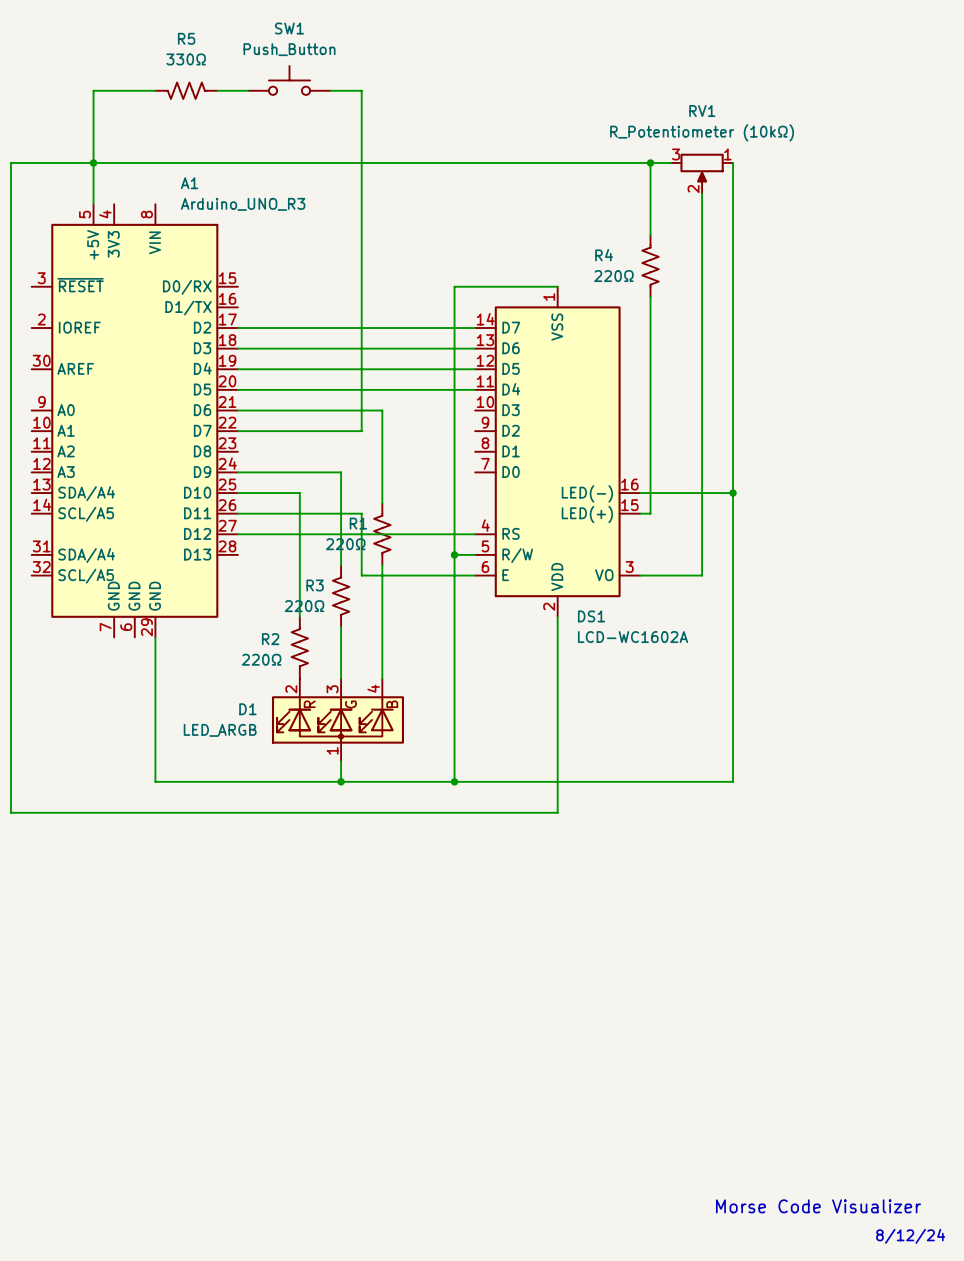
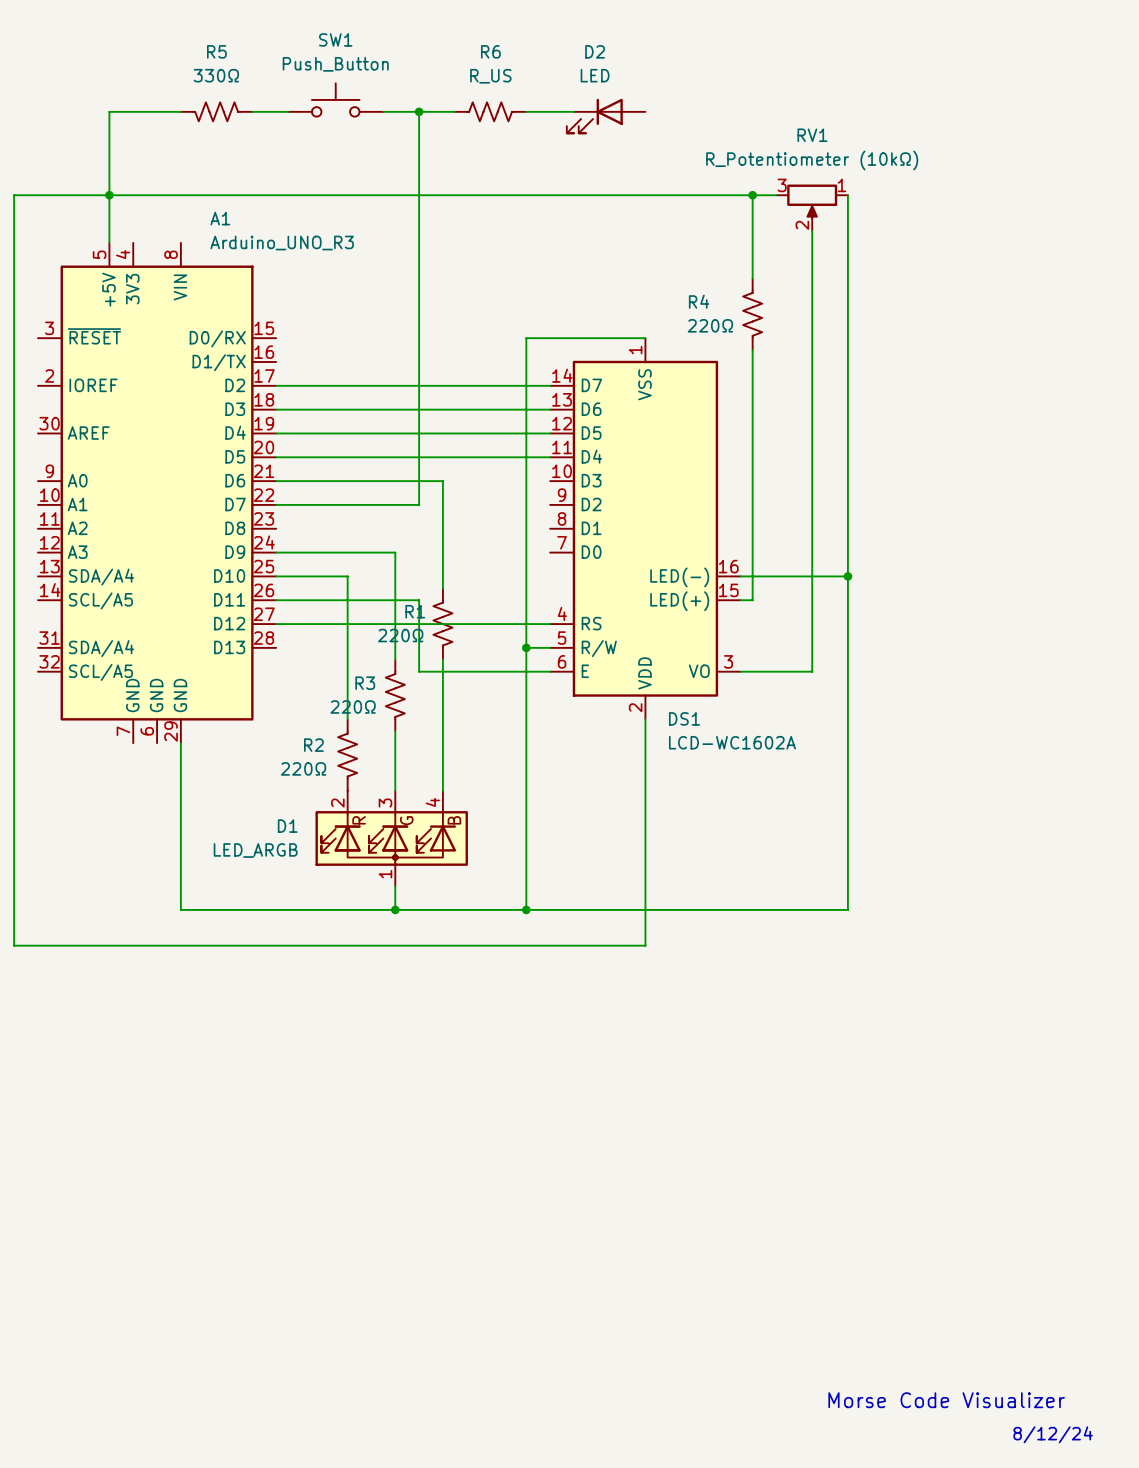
wire: none -> (419, 111) (454, 111)
junction: none -> (419, 111)
R6: none -> R_US (490, 111)
wire: none -> (526, 111) (573, 111)
D2: none -> LED (606, 116)

